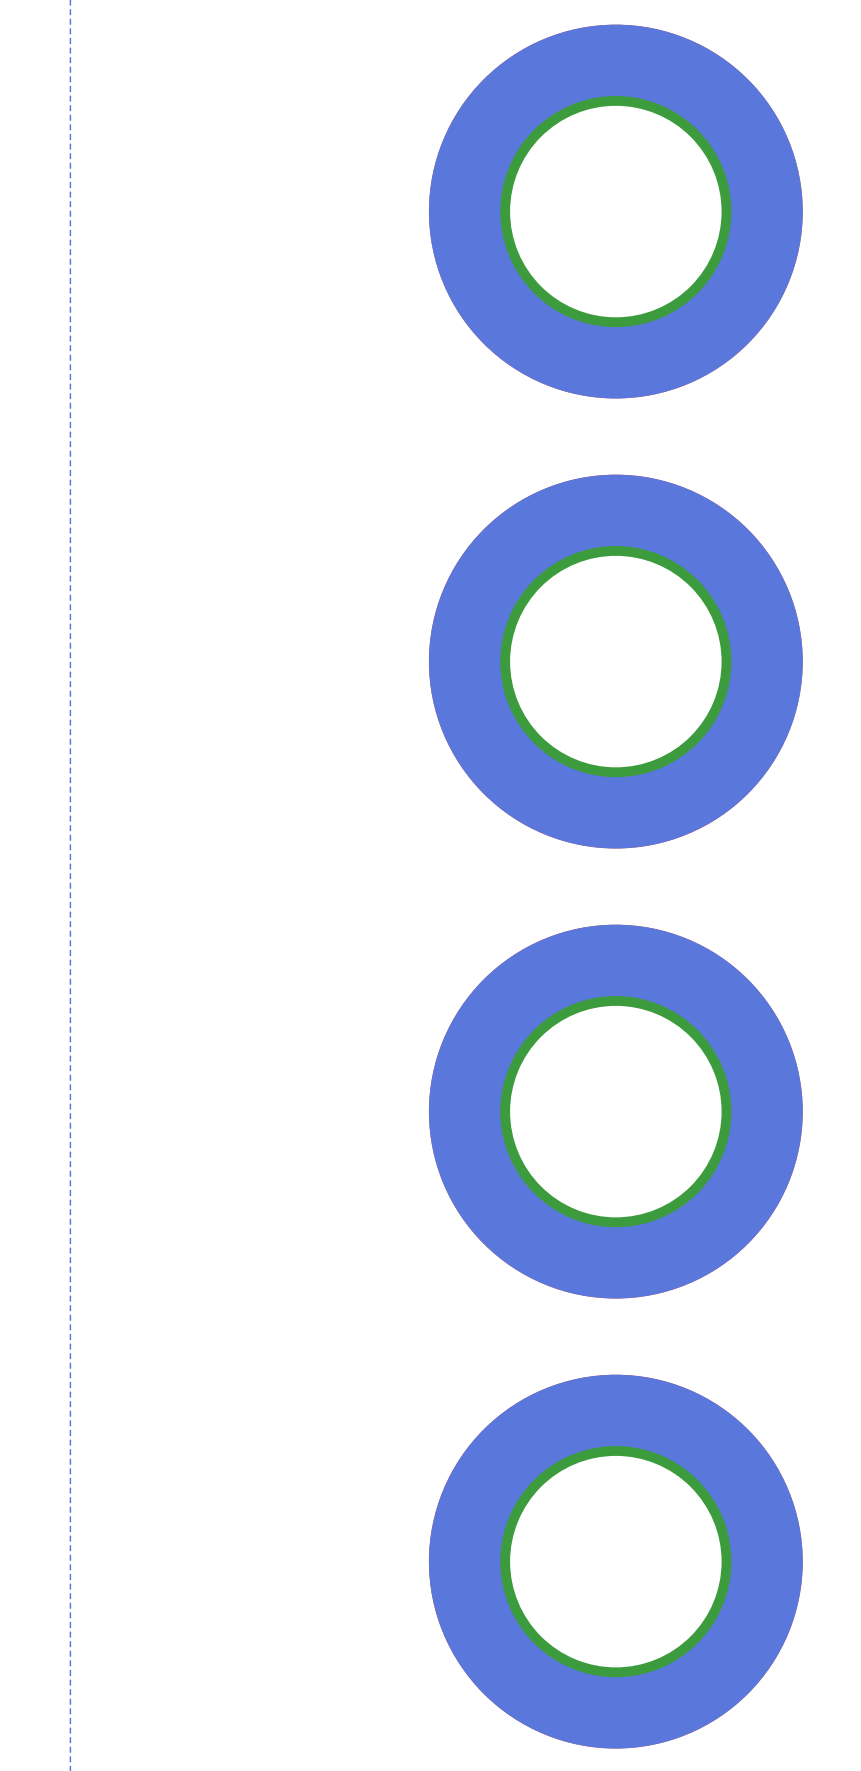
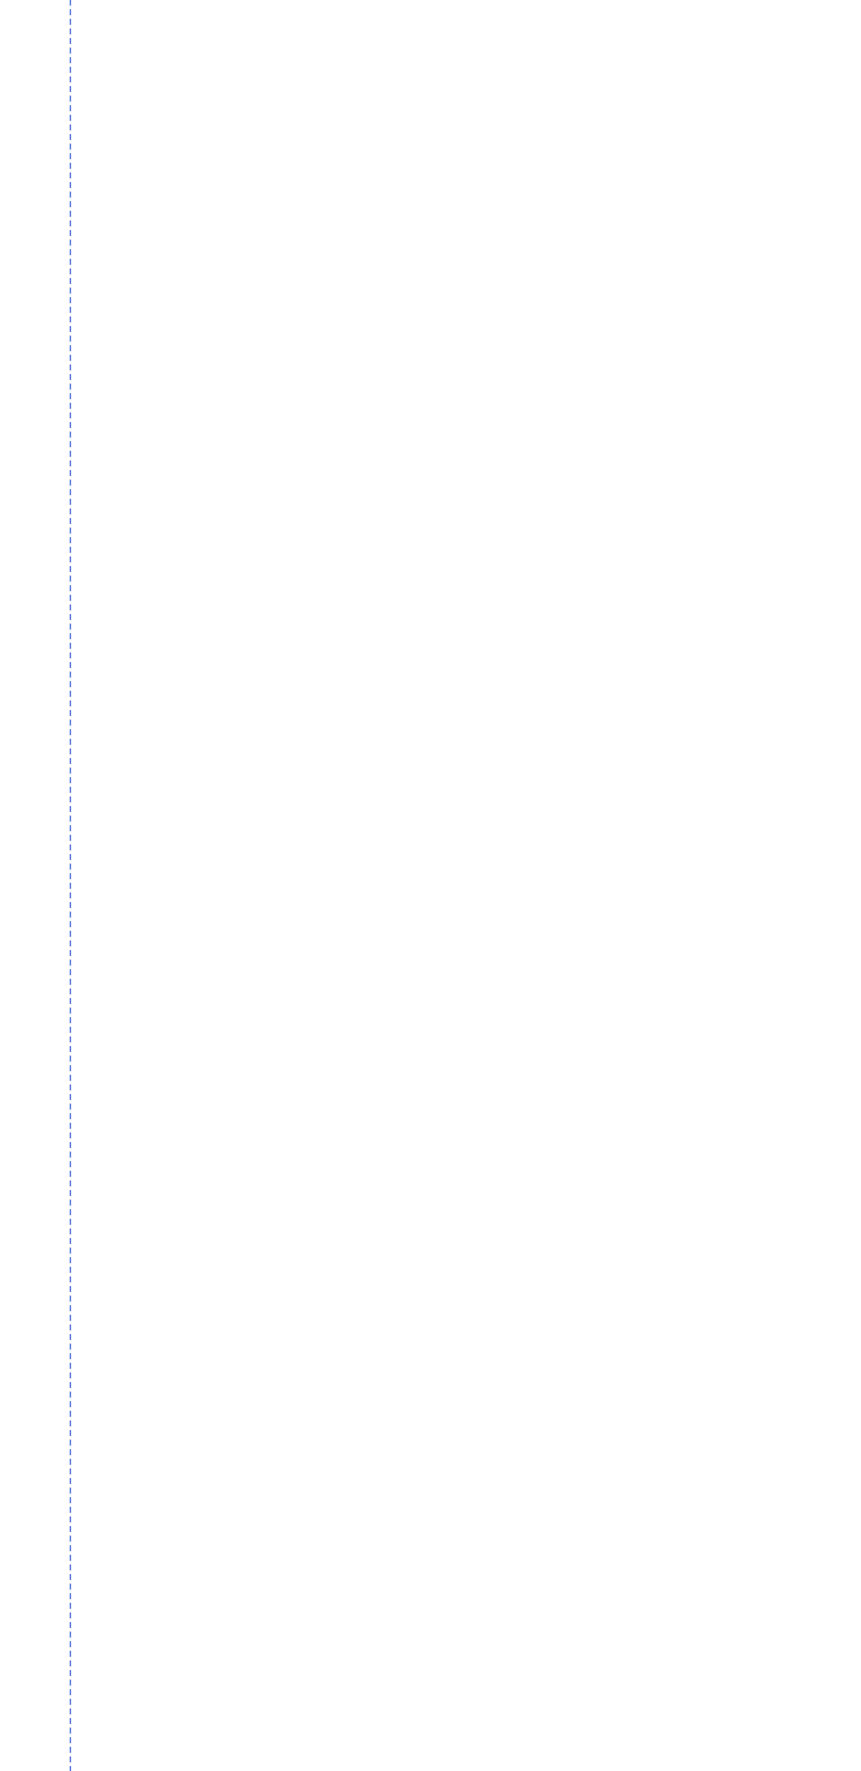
part: (615, 211) -> none
part: (615, 661) -> none
part: (615, 1111) -> none
part: (615, 1561) -> none

